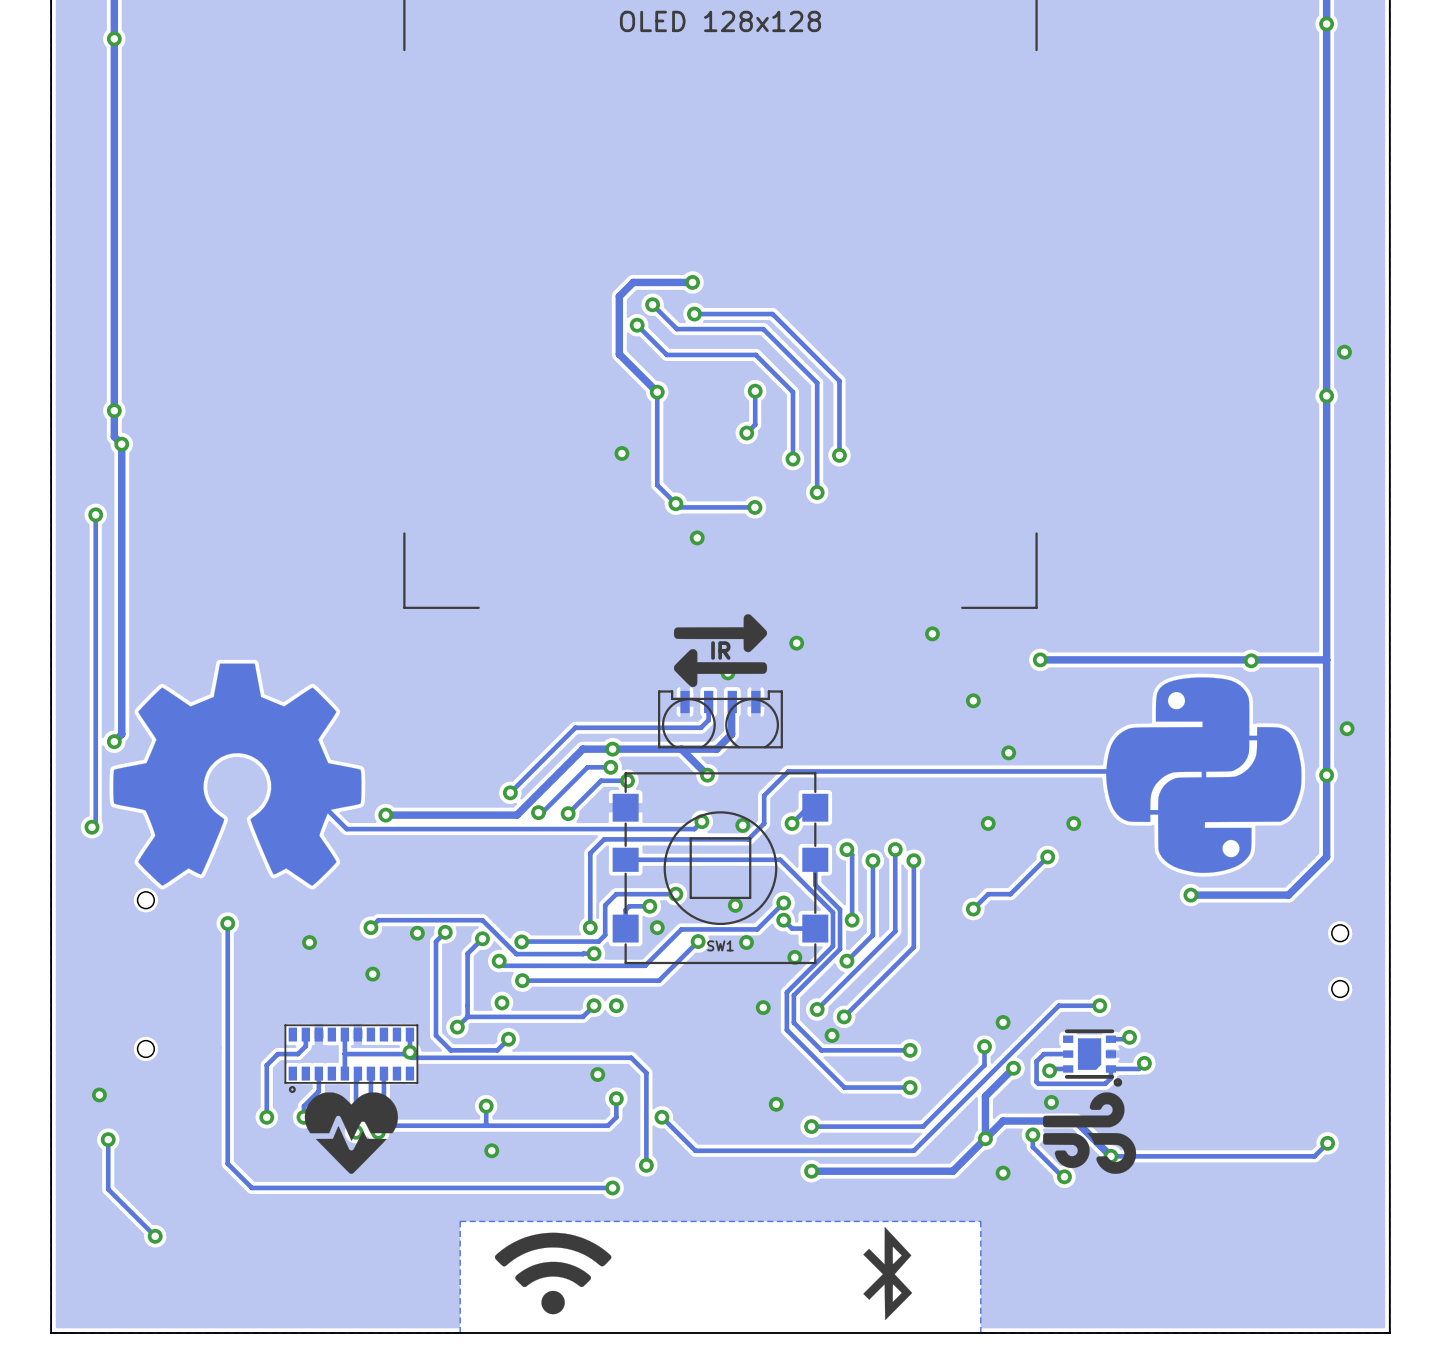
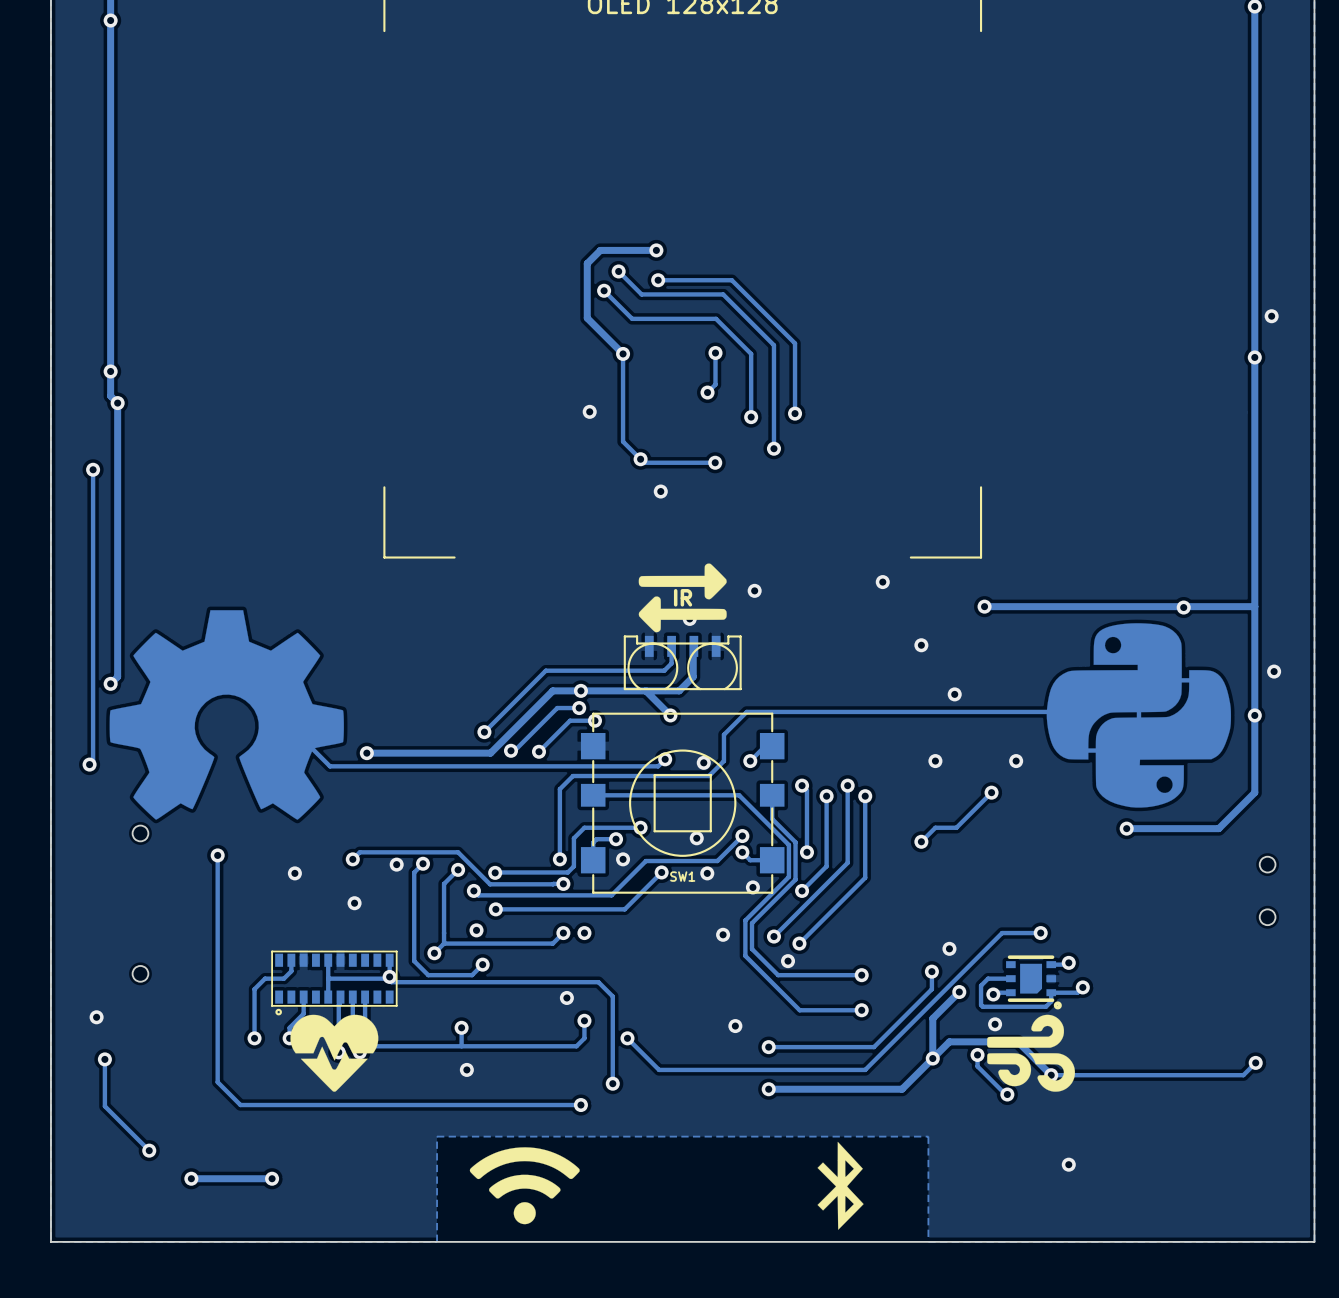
via: (1003, 1173) -> none
via: none -> (1068, 1164)
via: none -> (191, 1178)
track: none -> (272, 1178) (191, 1178)
via: none -> (272, 1178)

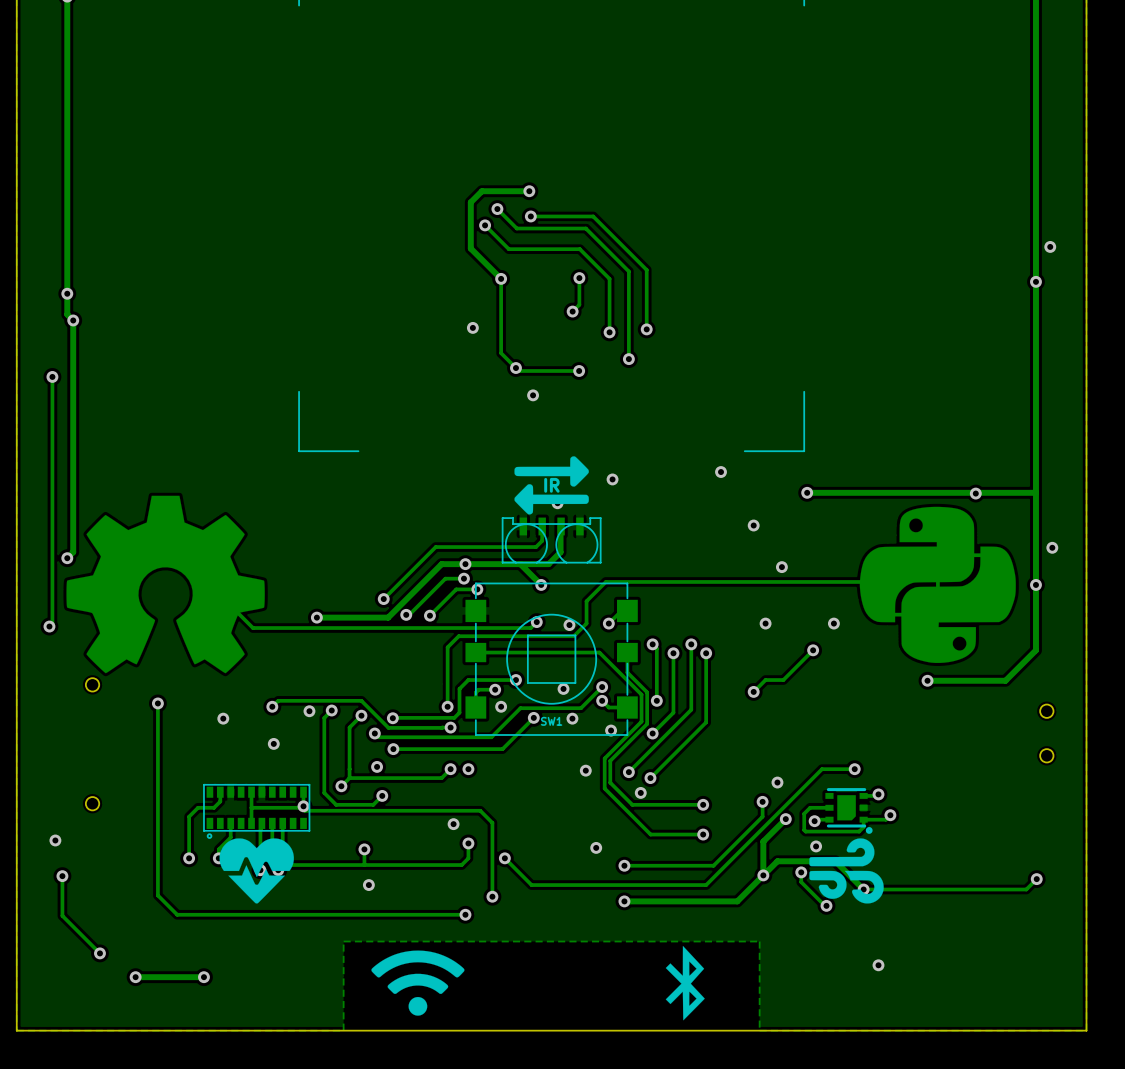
via position: (366, 753) -> (316, 617)
track: (490, 753) (366, 753) -> (388, 616) (316, 617)

